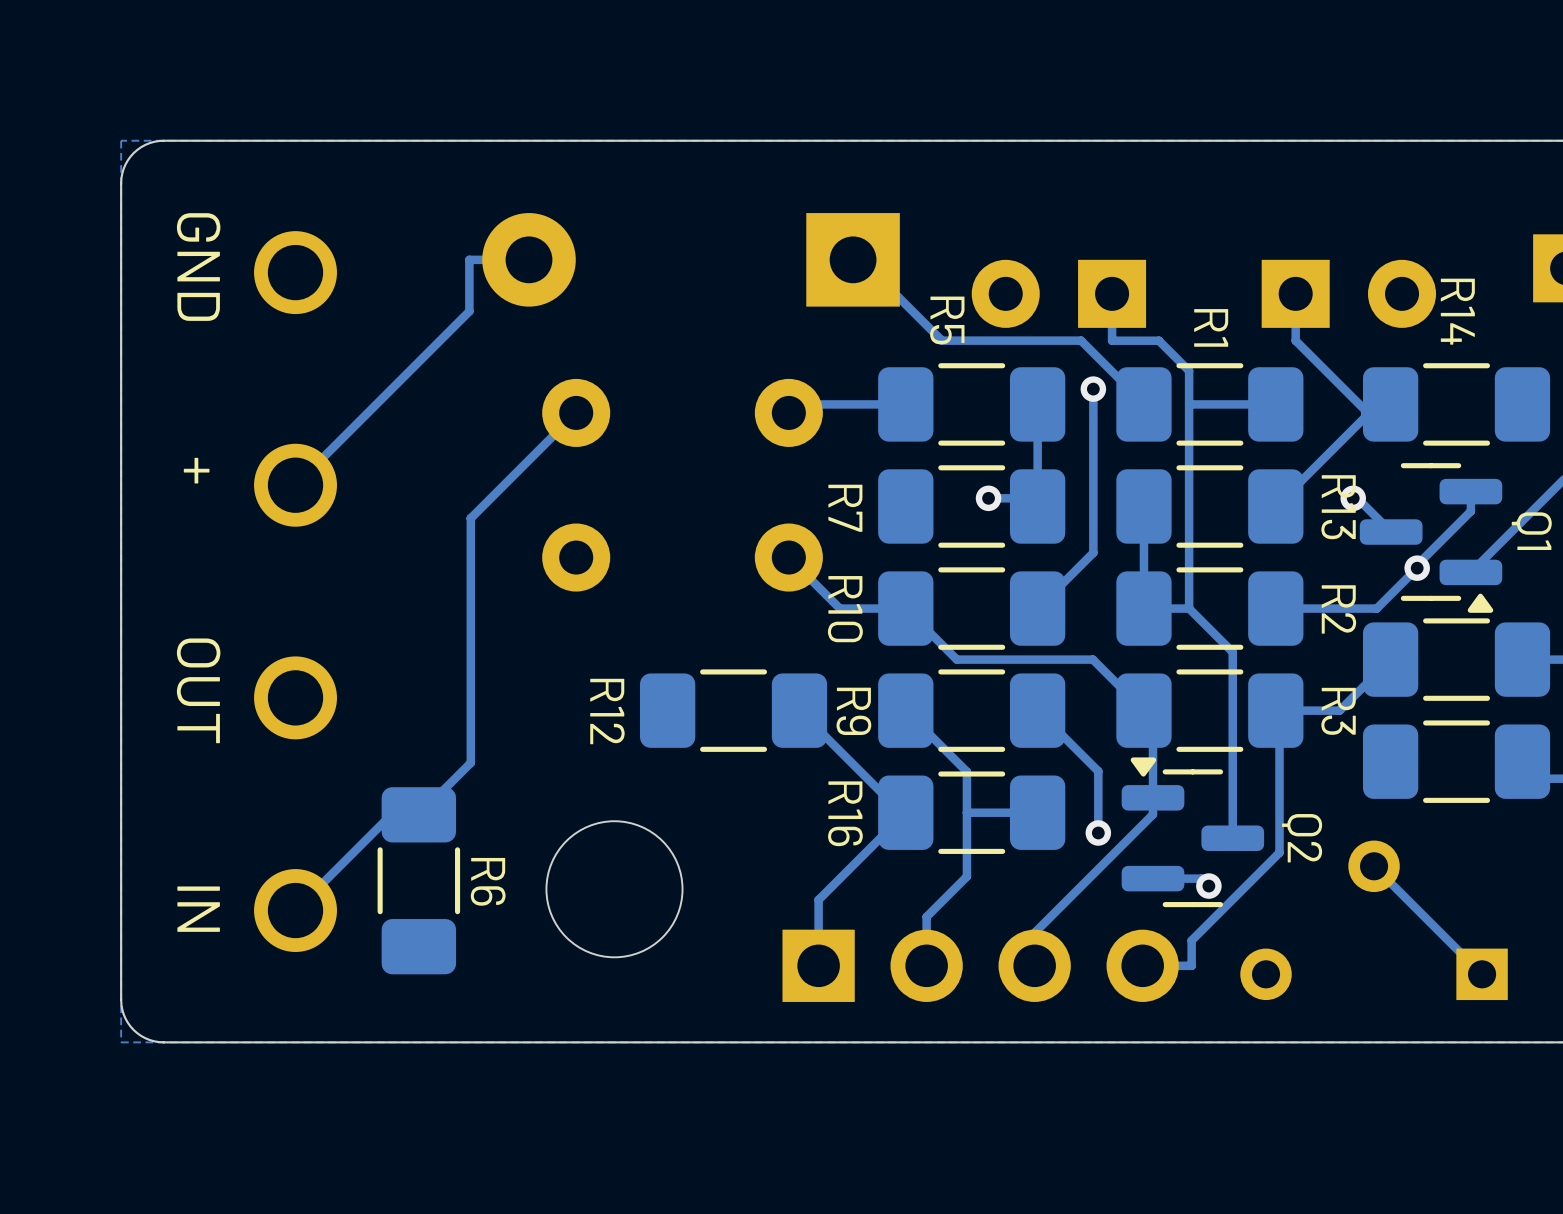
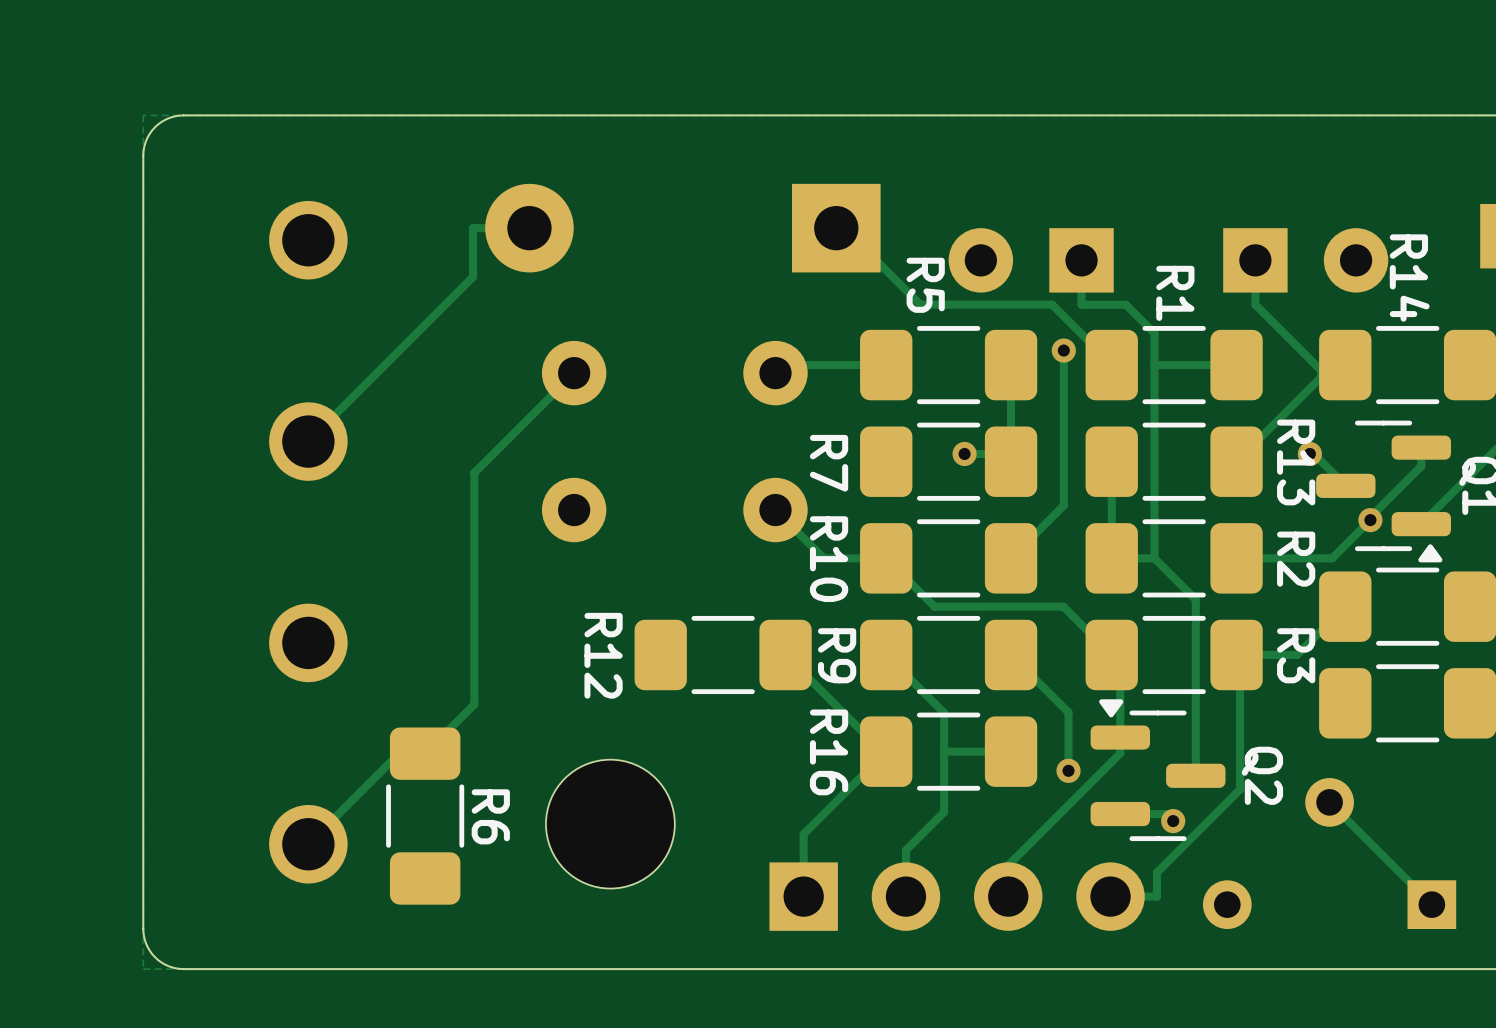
text: GND (198, 267) -> none
text: + (196, 470) -> none
text: OUT (198, 690) -> none
text: IN (198, 909) -> none

